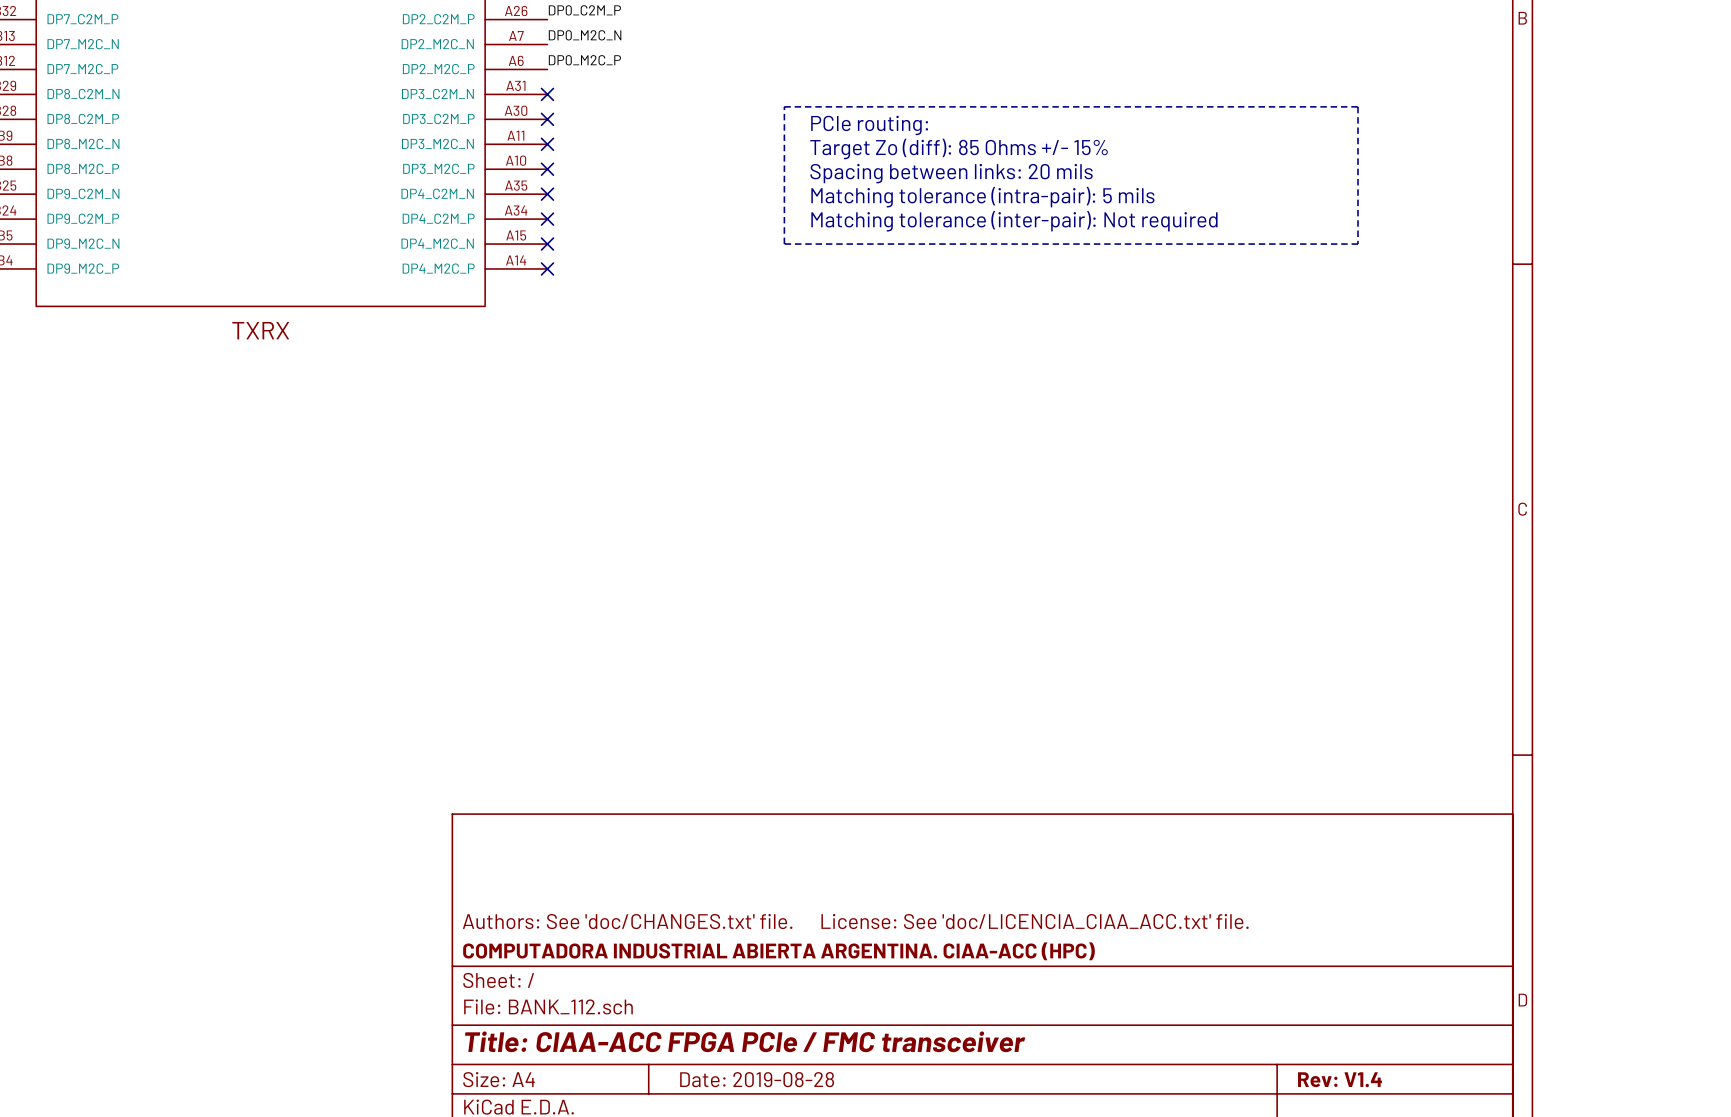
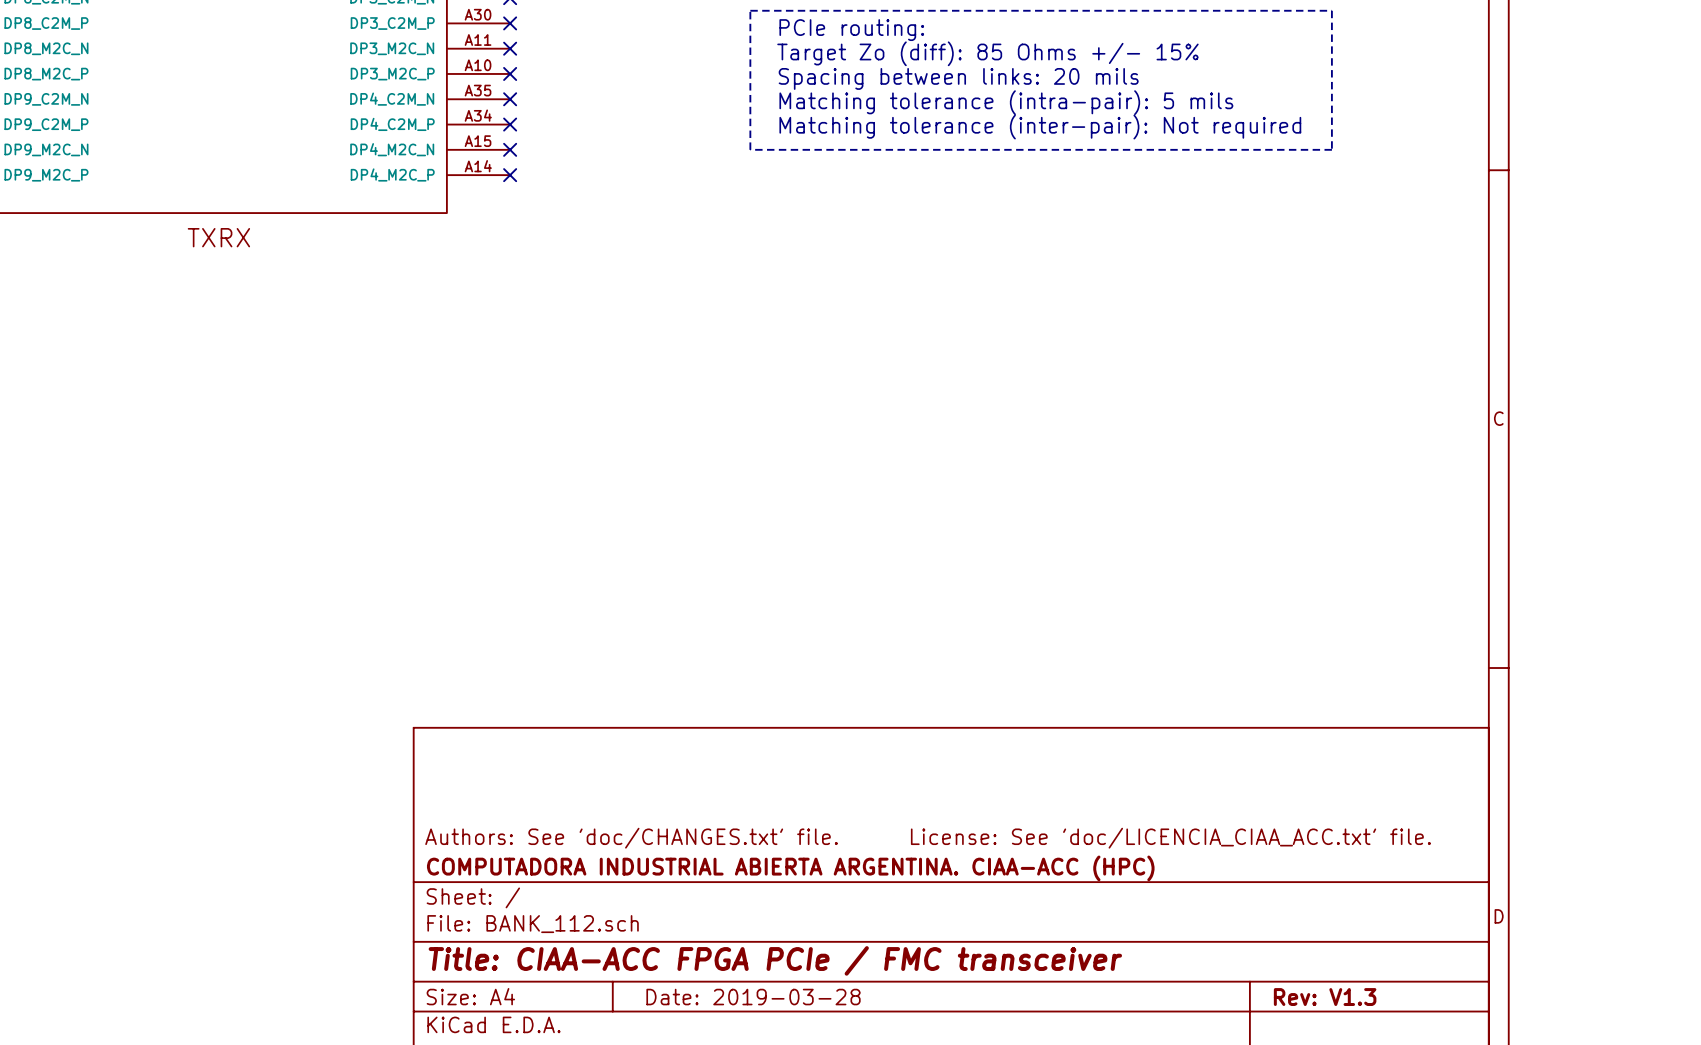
title block: Date: 2019-08-28 (757, 1079) -> Date: 2019-03-28 (753, 997)
title block: Rev: V1.4 (1339, 1079) -> Rev: V1.3 (1325, 997)

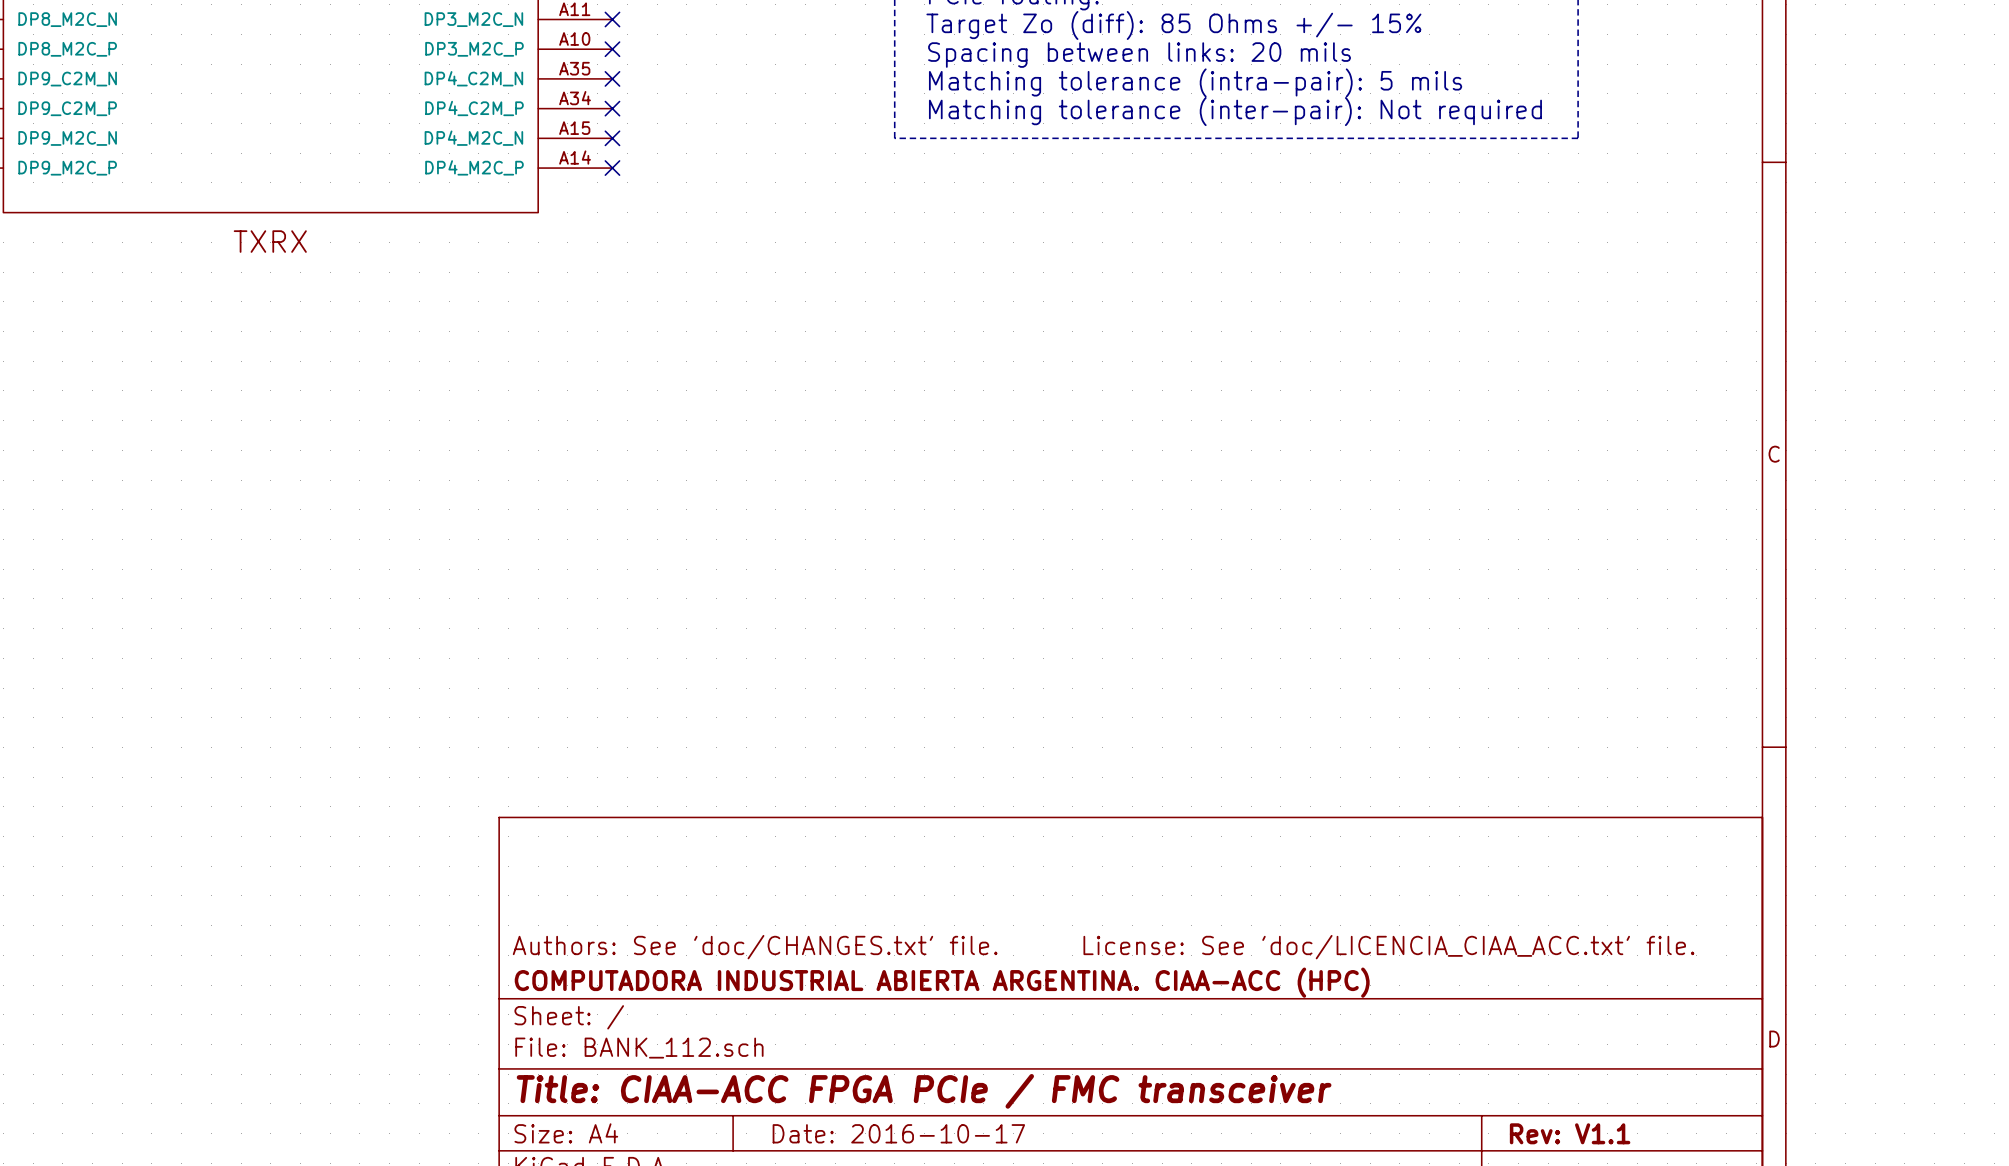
title block: Date: 2019-03-28 (753, 997) -> Date: 2016-10-17 (898, 1133)
title block: Rev: V1.3 (1325, 997) -> Rev: V1.1 (1570, 1133)

